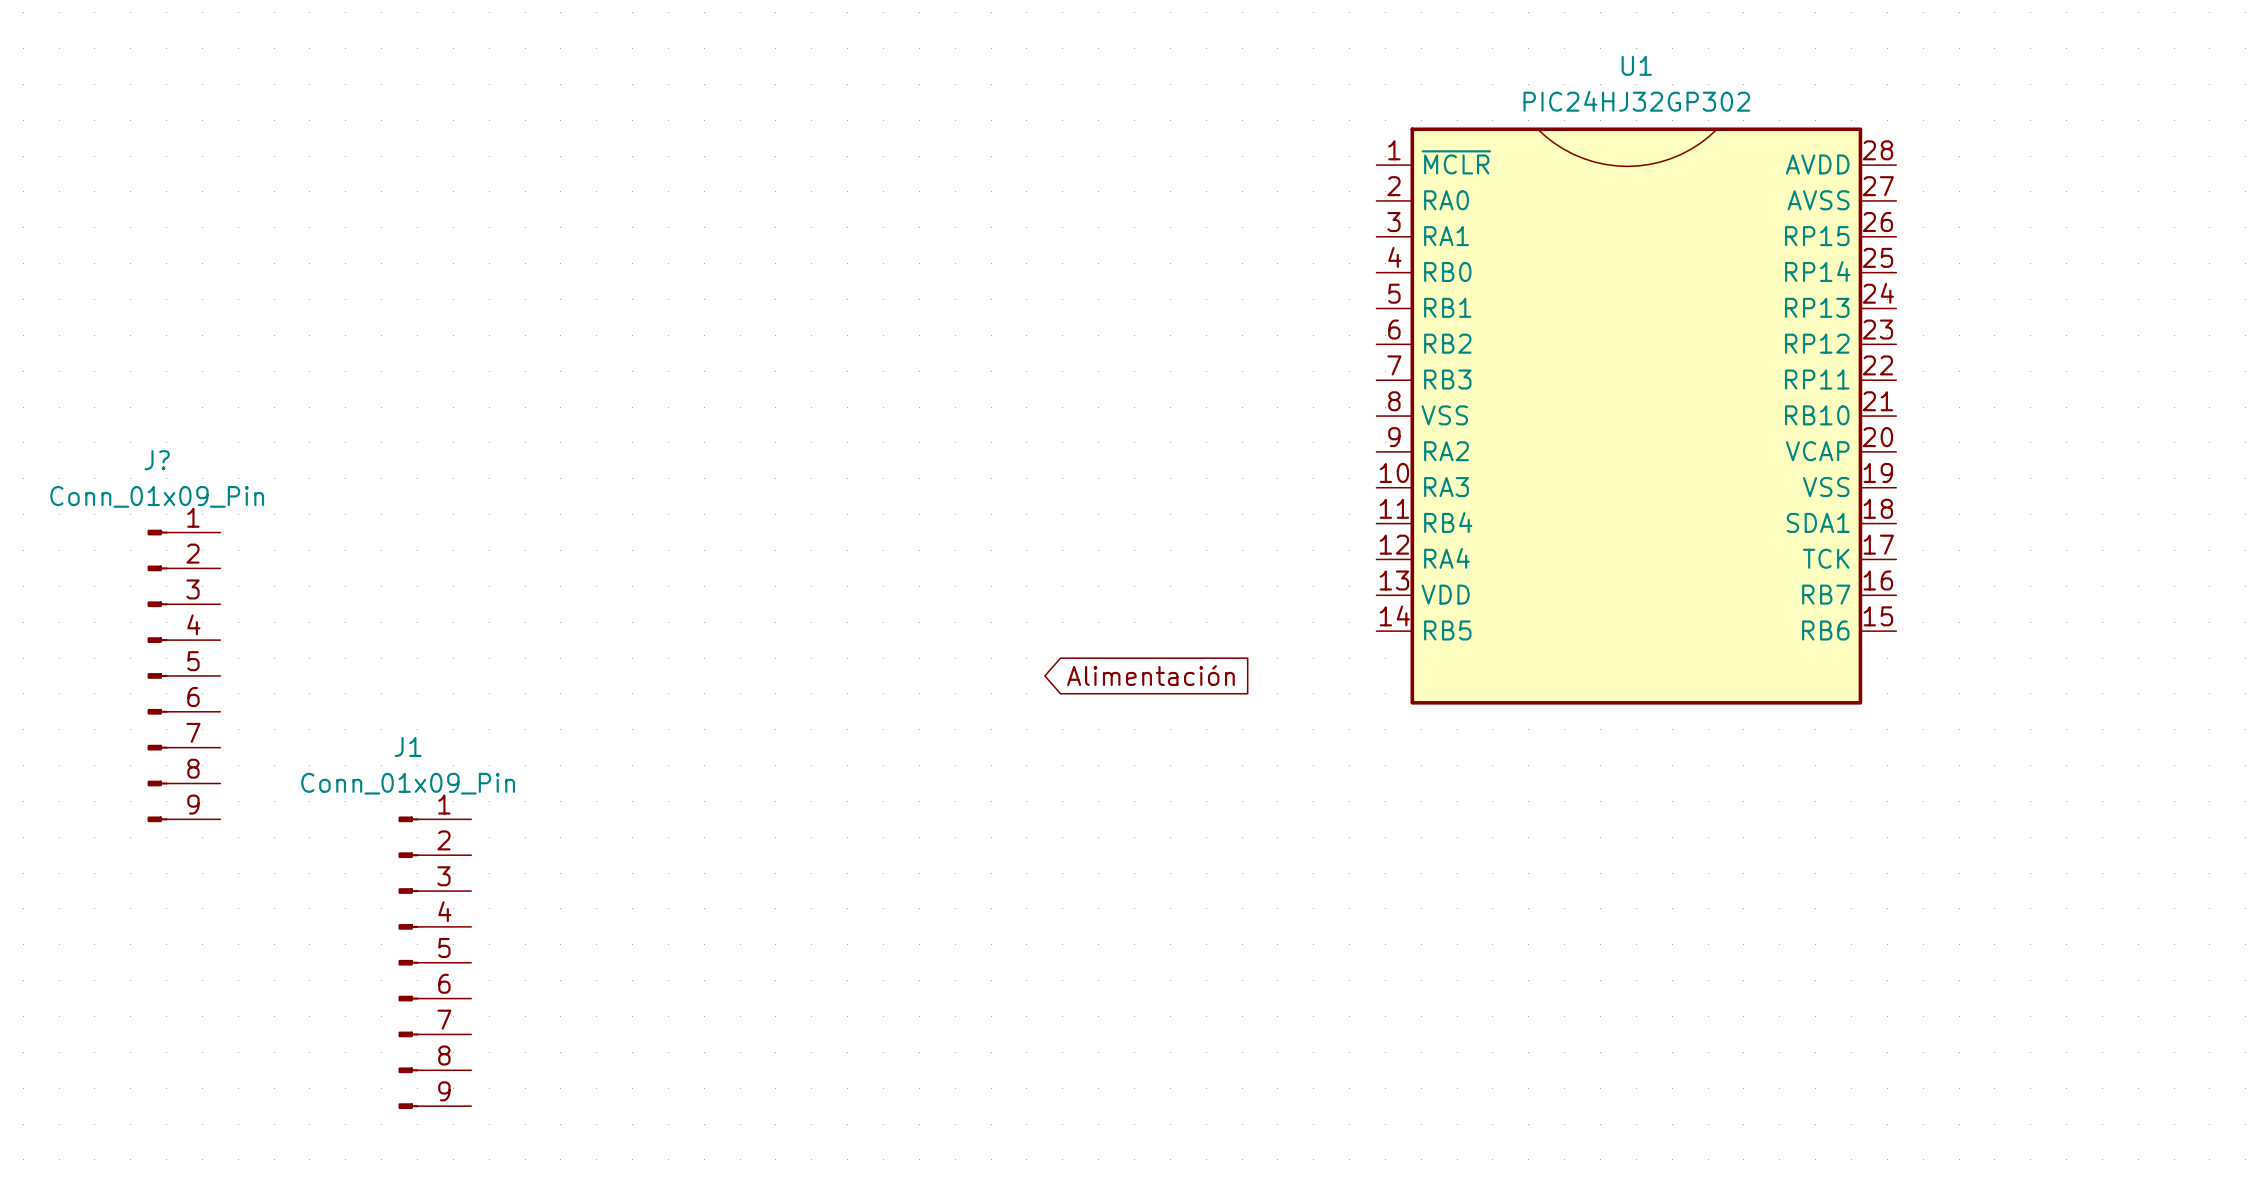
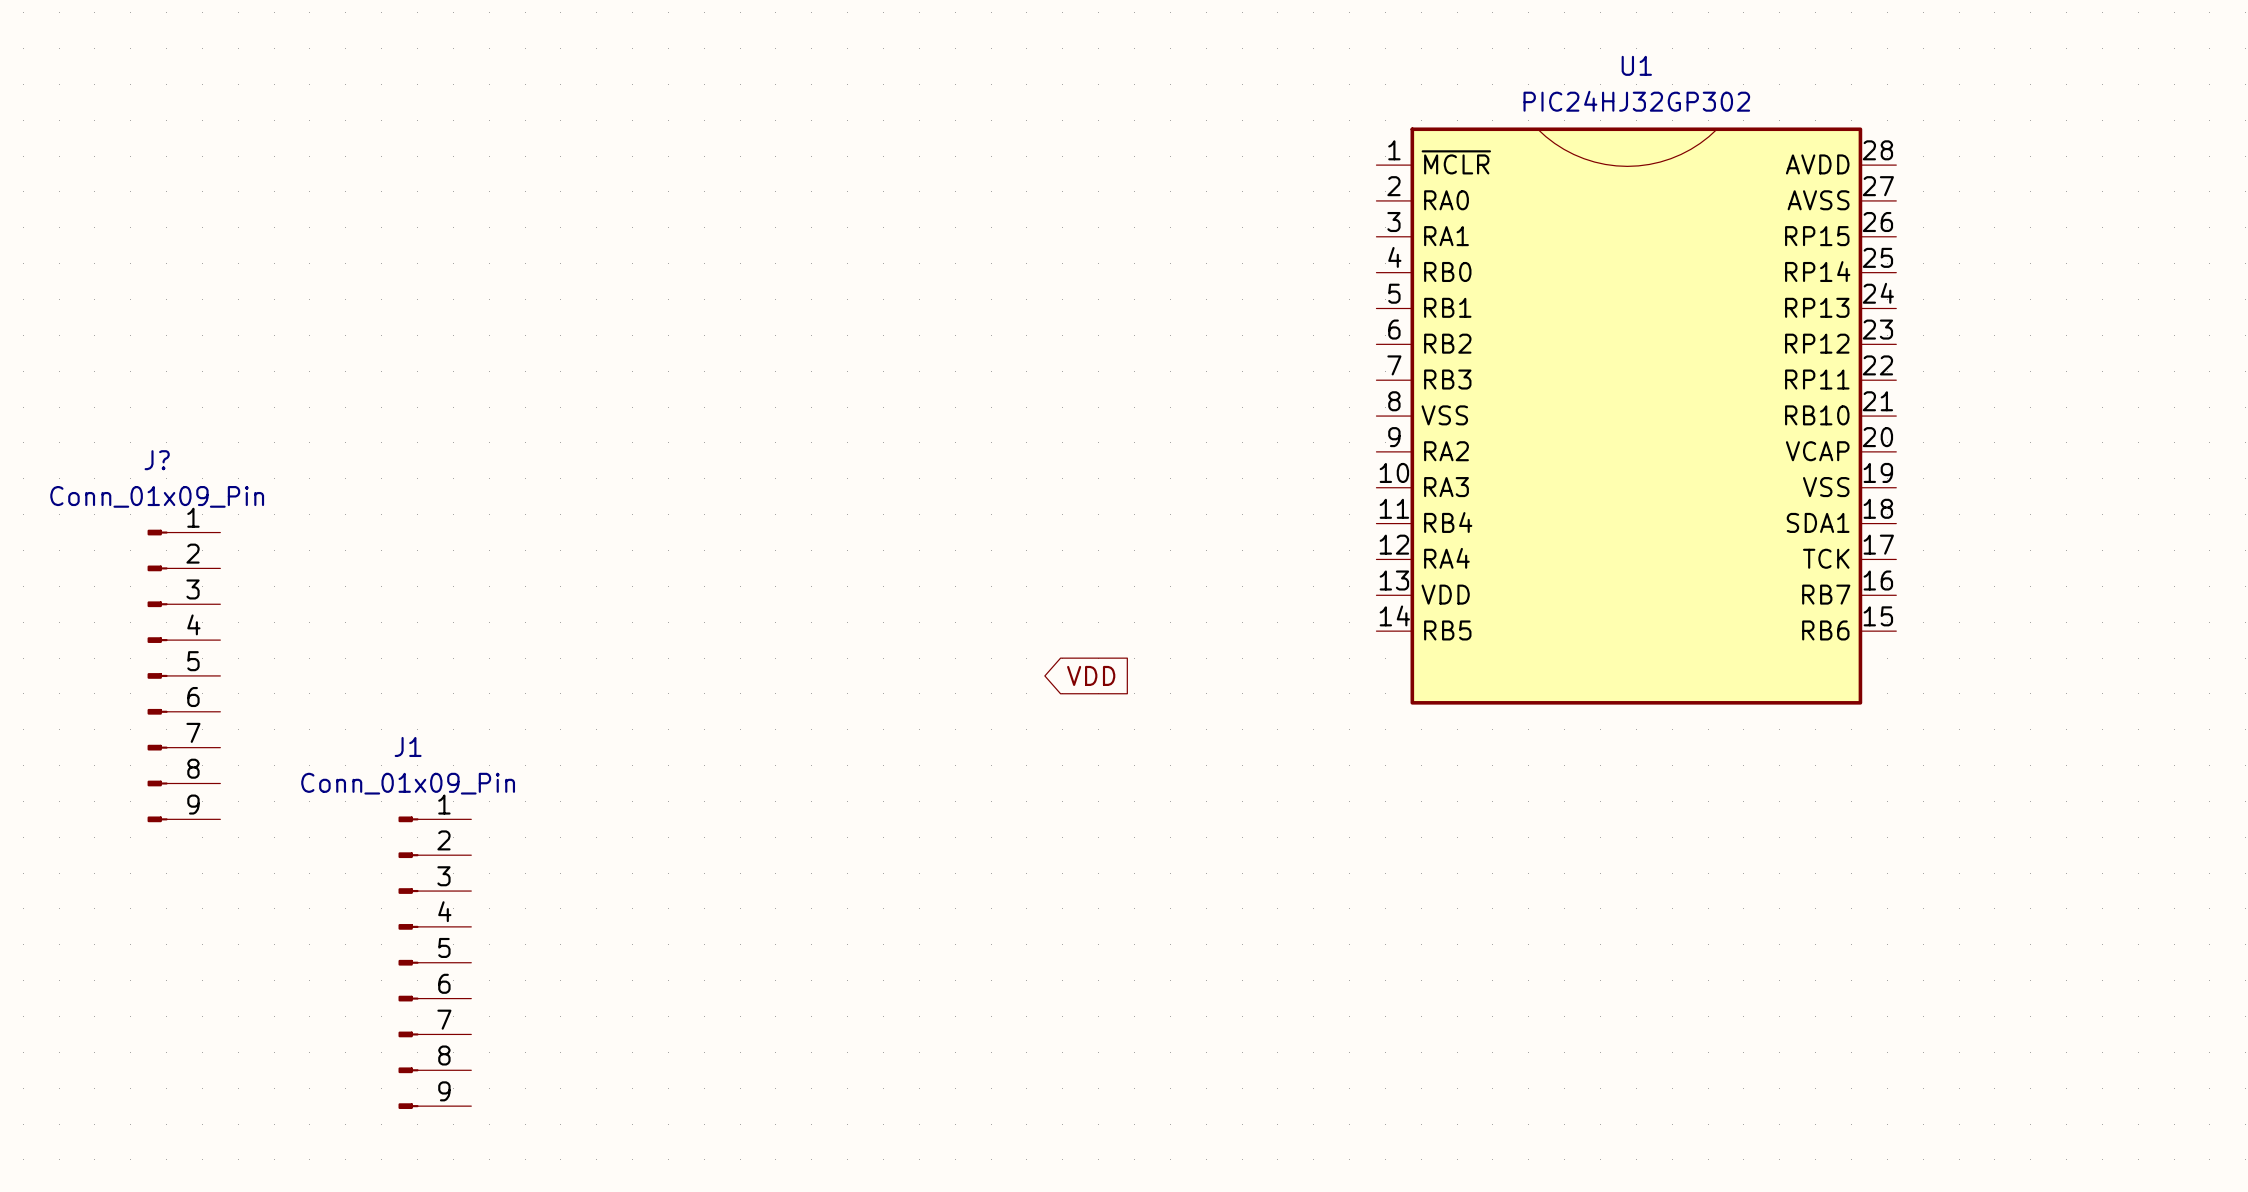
global label: Alimentación (1150, 675) -> VDD (1091, 675)

